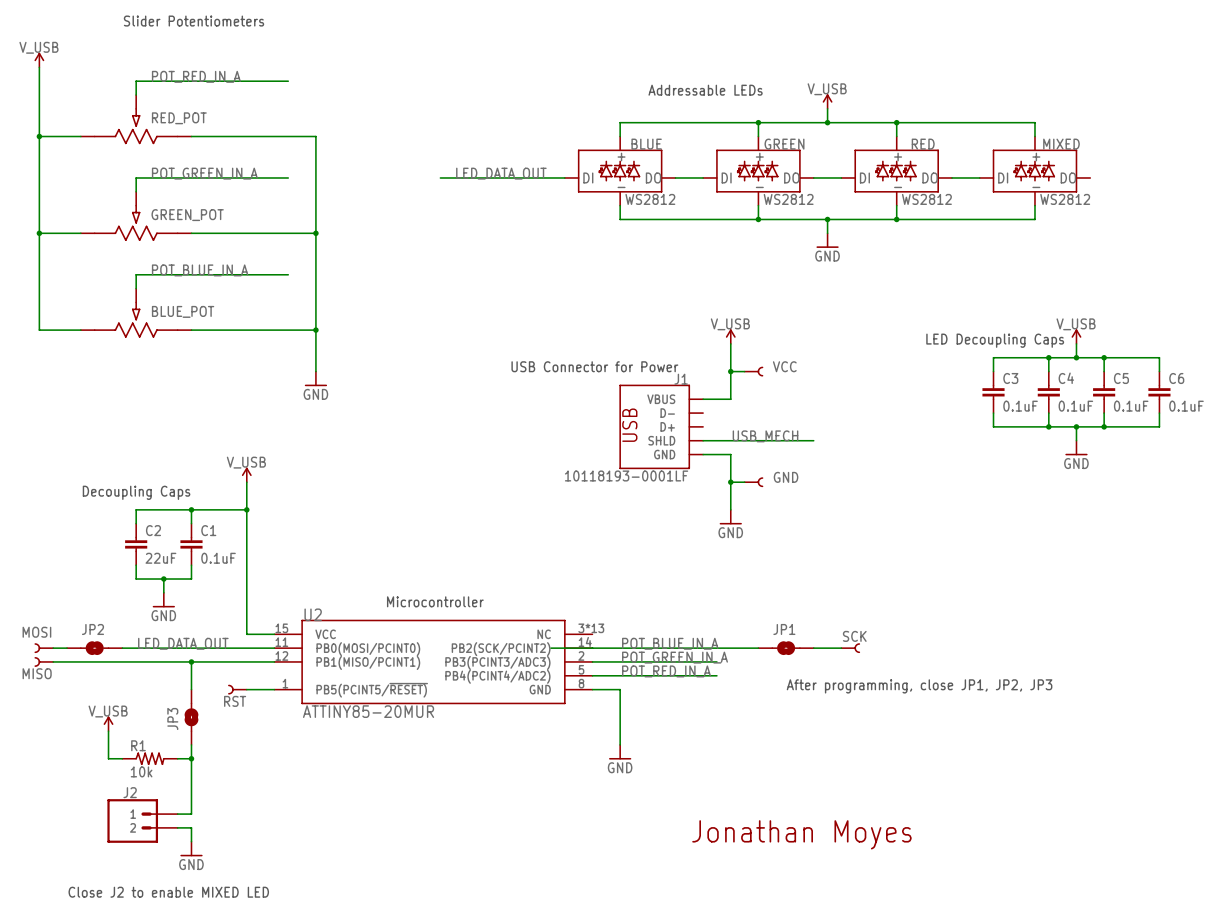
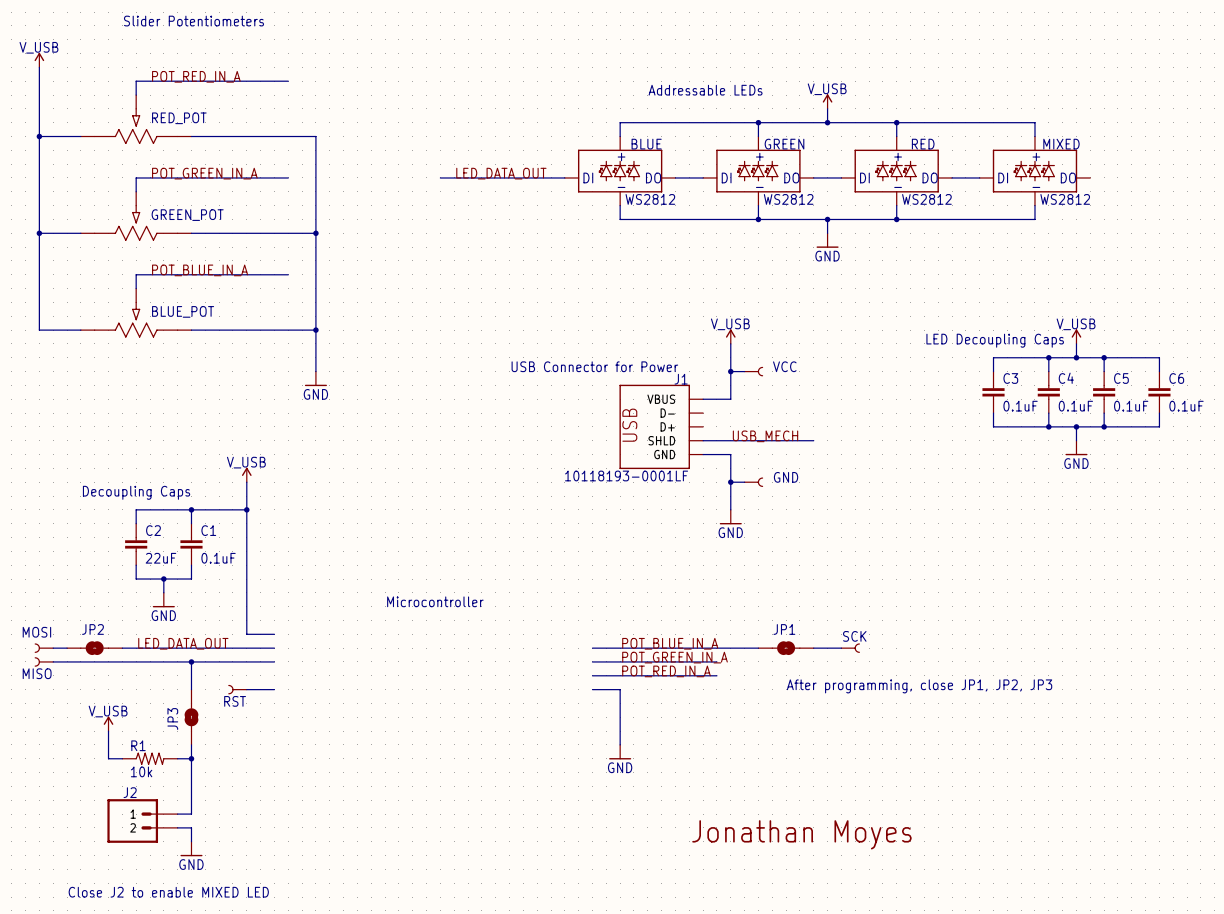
wire: (551, 648) (592, 648) -> none
U2: ATTINY85-20MUR (433, 661) -> none

